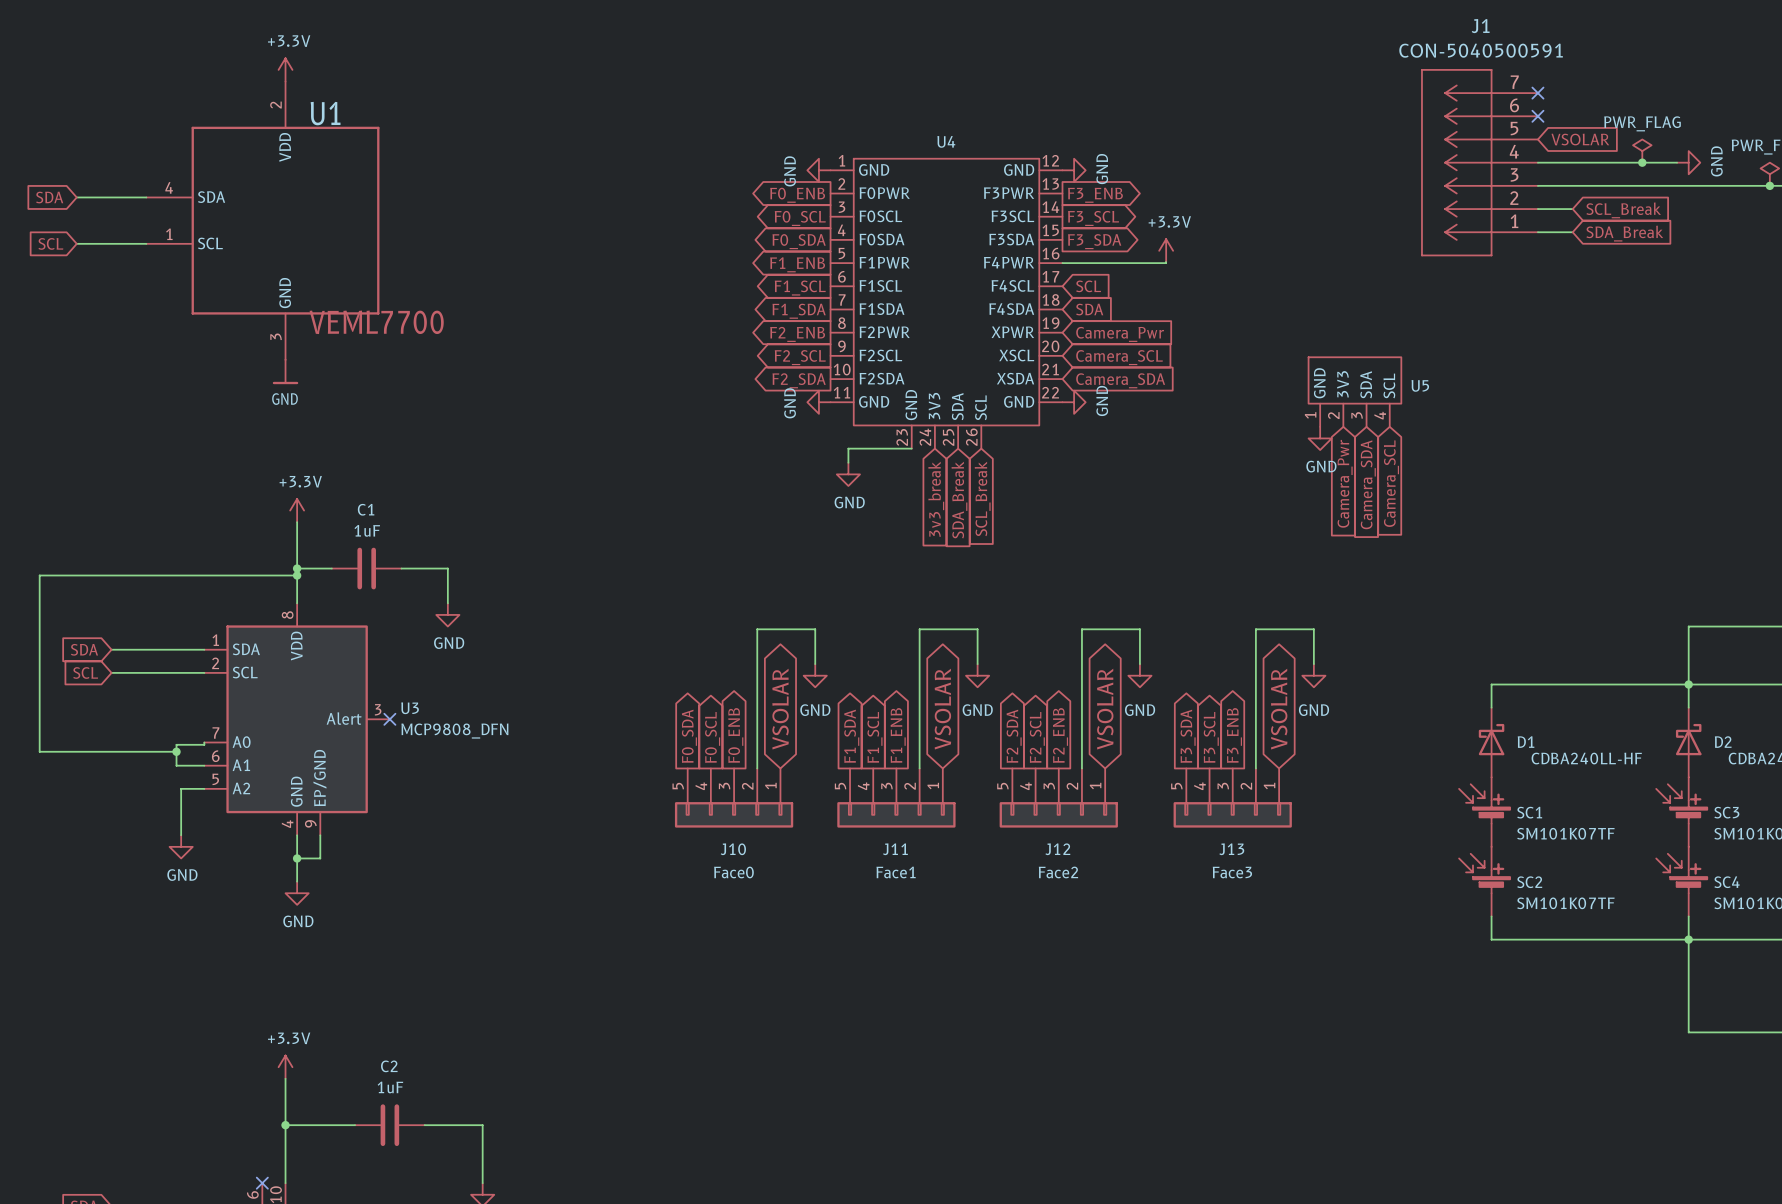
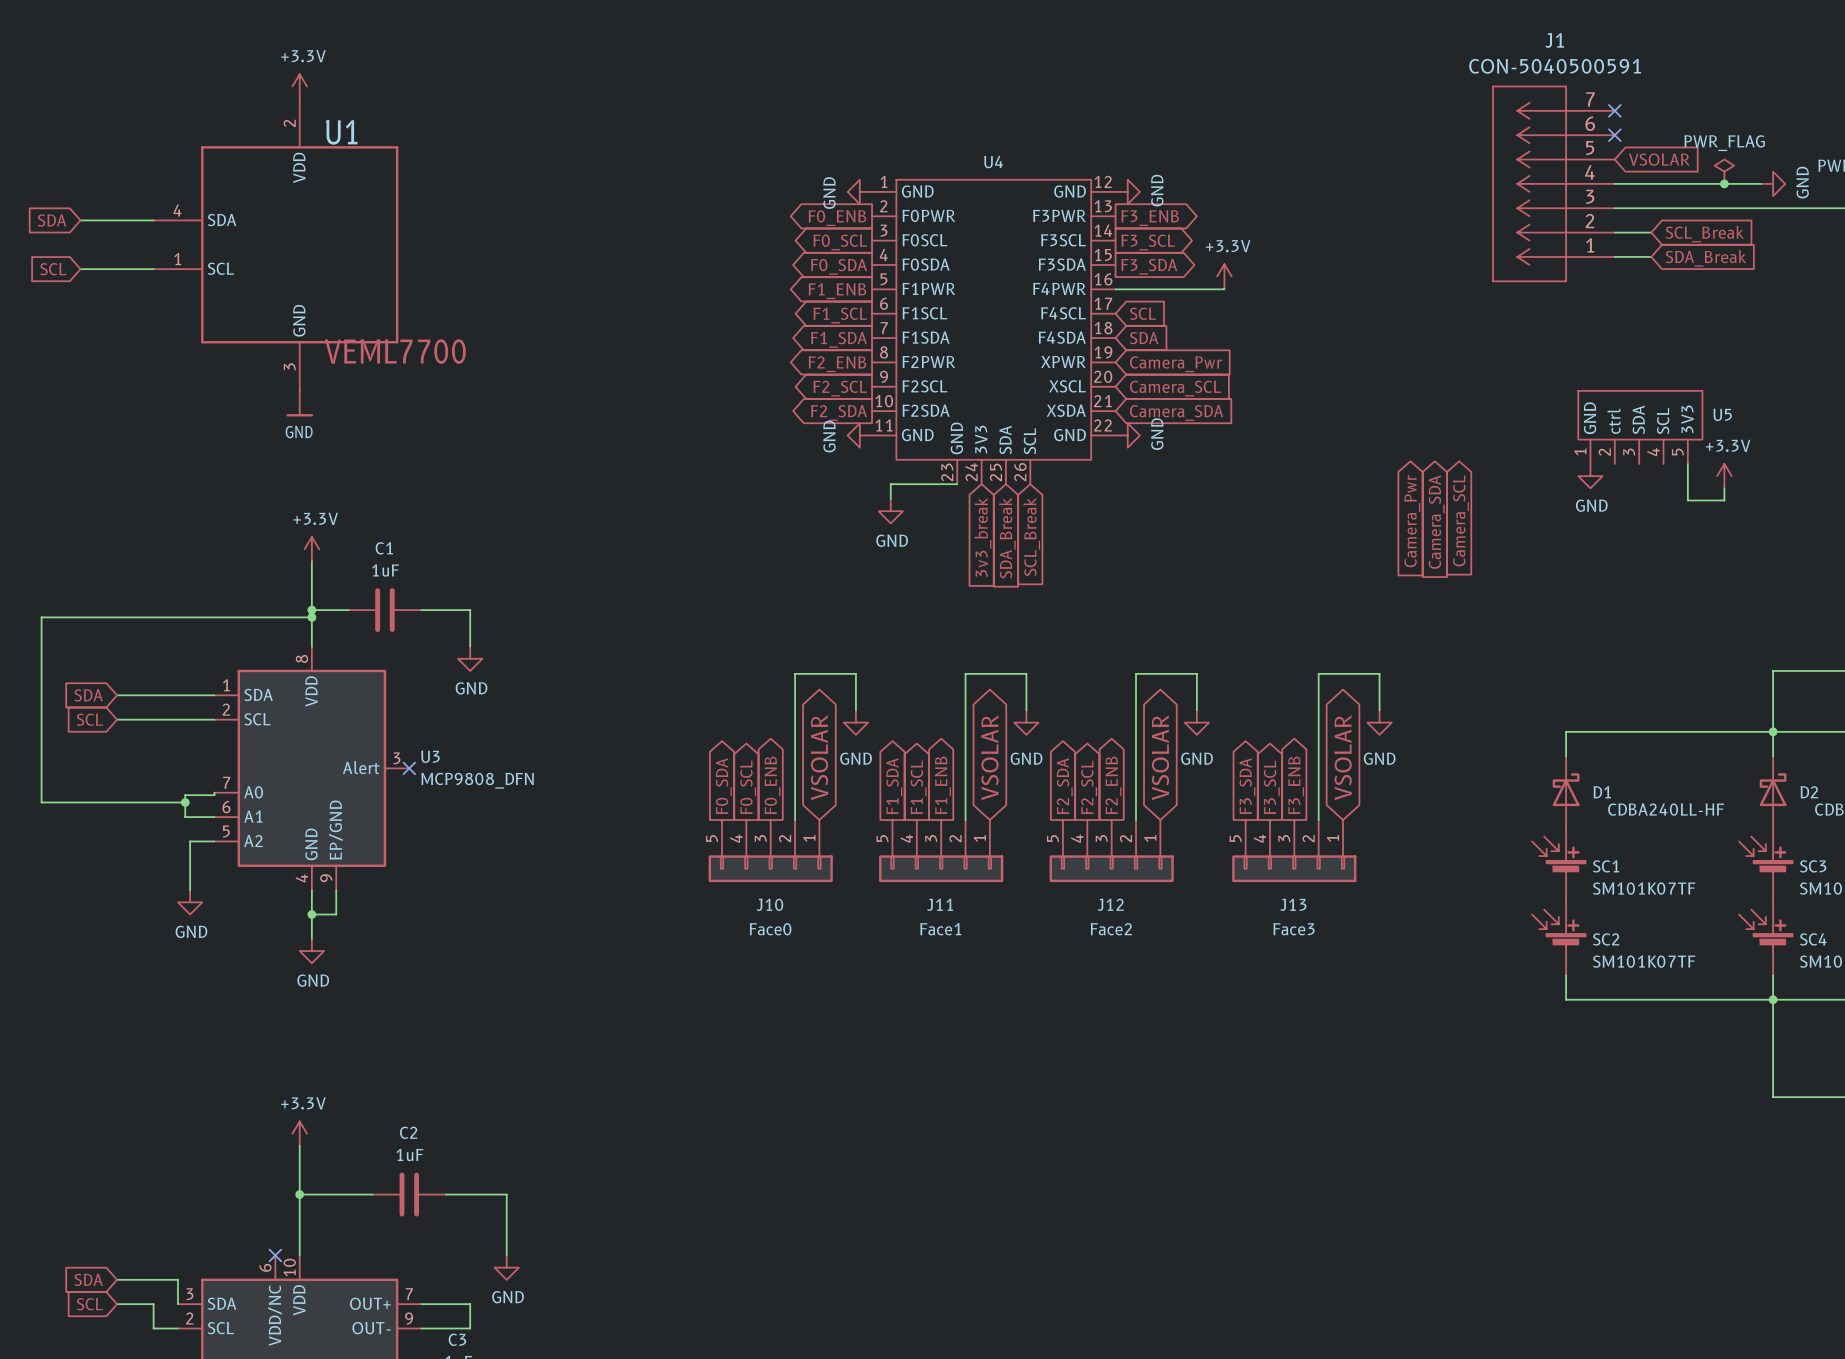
U5 symbol: [1308, 357, 1402, 427] -> [1578, 390, 1703, 464]
wire: none -> (1687, 463) (1687, 500) (1724, 500) (1724, 488)
power symbol position: GND (1320, 438) -> GND (1590, 476)
power symbol: none -> +3.3V (1724, 476)

